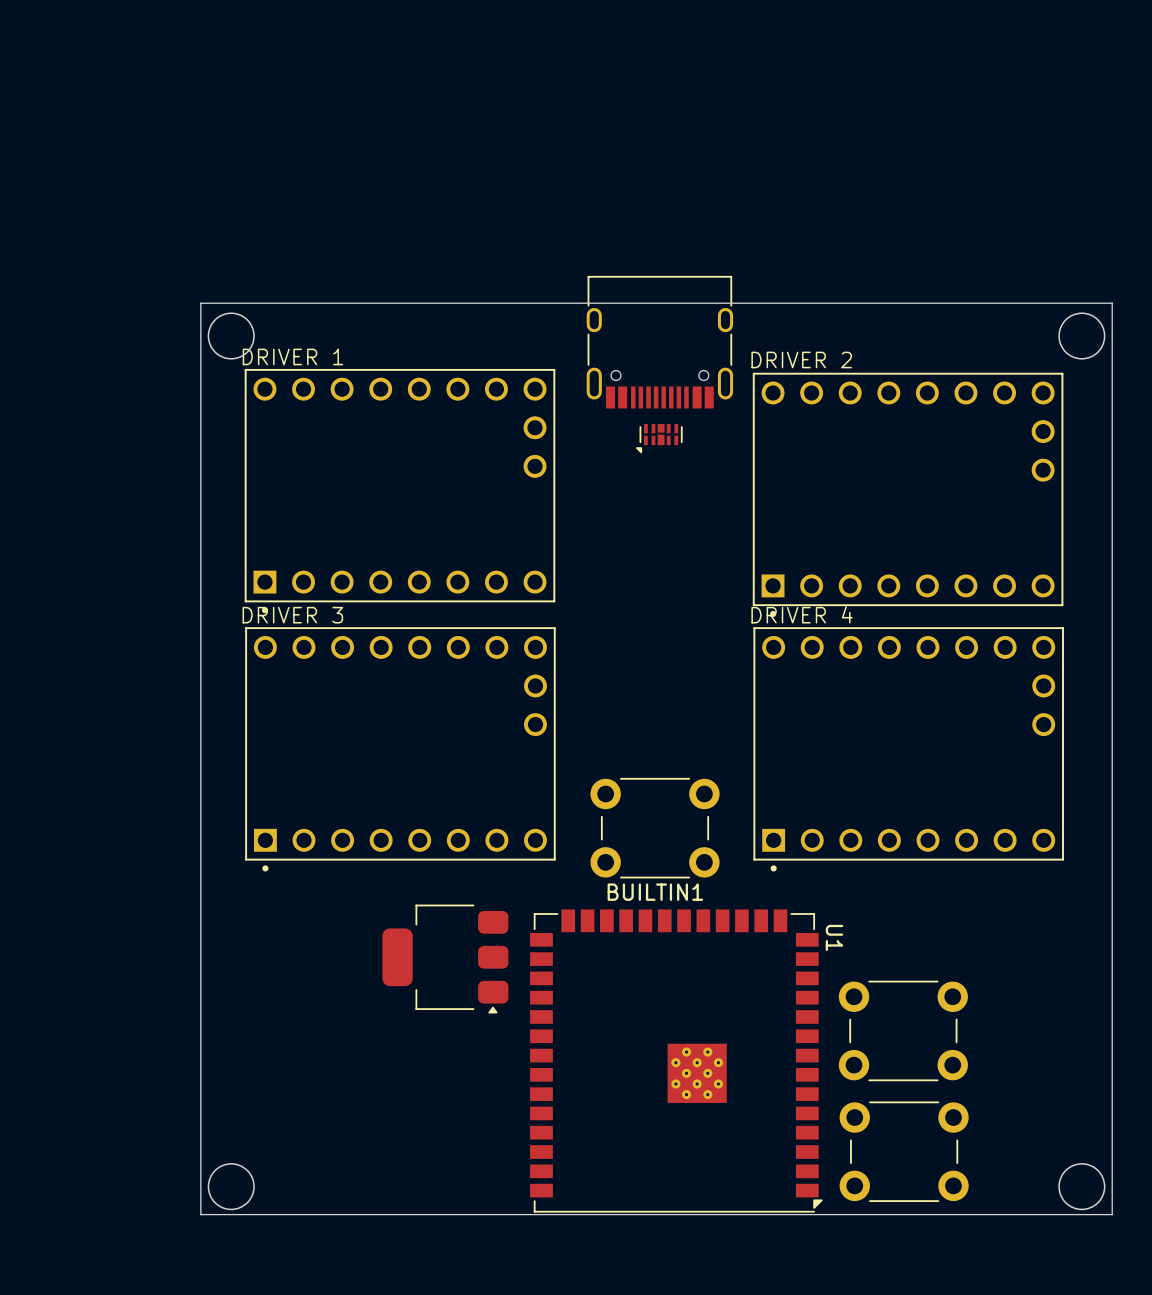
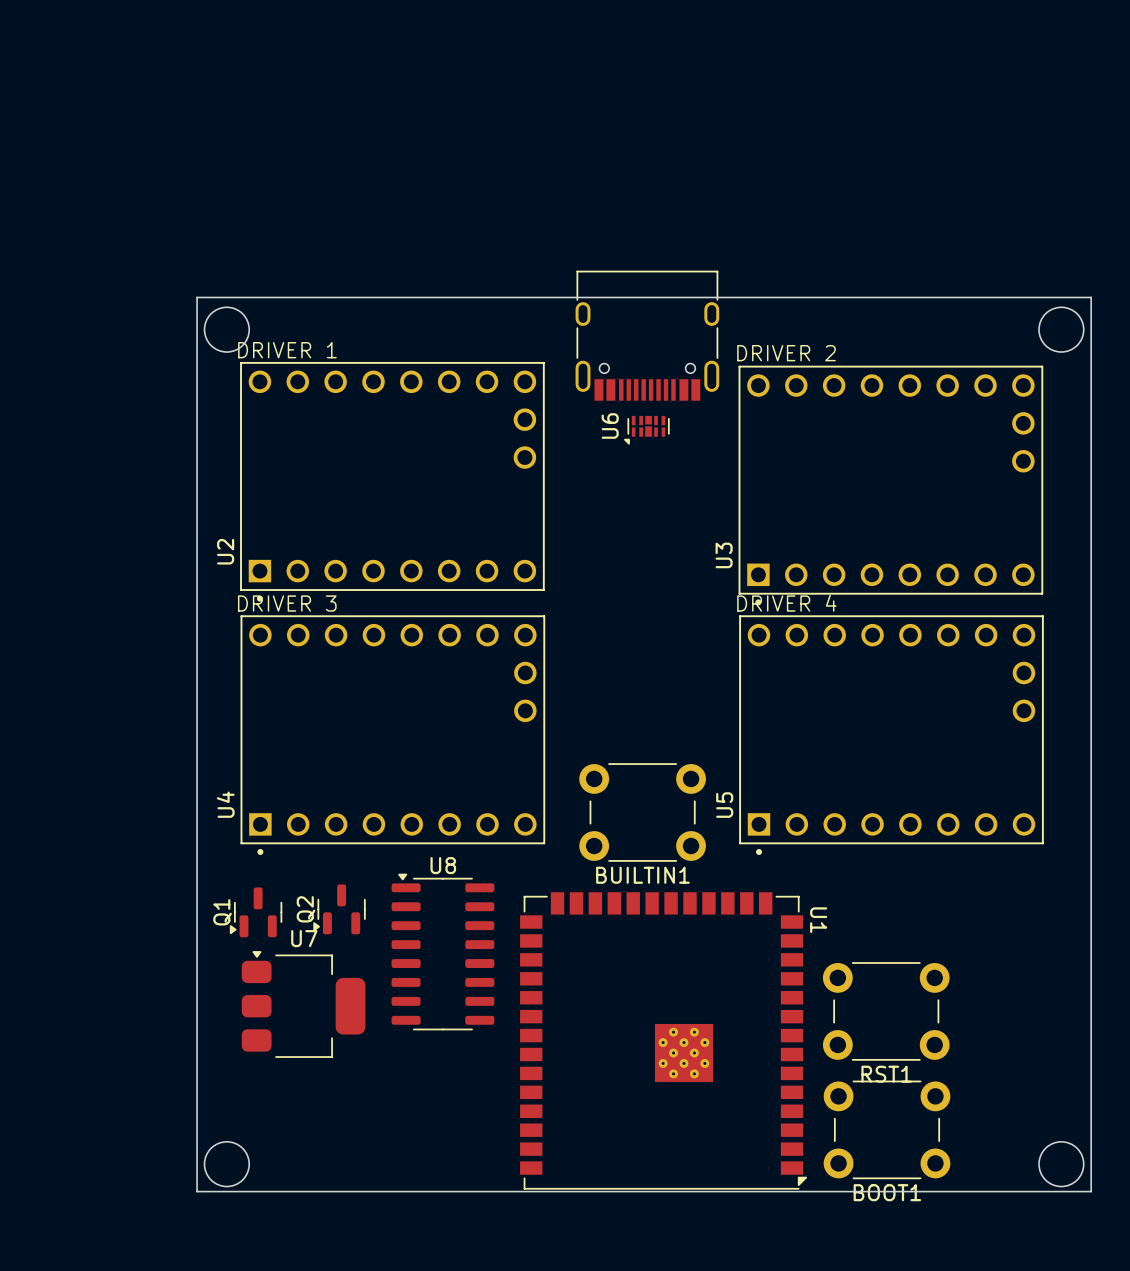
U6 name: none -> U6 (610, 425)
U2 name: none -> U2 (225, 551)
U3 name: none -> U3 (724, 555)
U4 name: none -> U4 (225, 804)
U5 name: none -> U5 (724, 805)
Q2: none -> (339, 909)
Q1: none -> (256, 912)
part: (445, 959) -> none
U8: none -> (442, 952)
U7: none -> (303, 1004)
RST1 name: none -> RST1 (886, 1074)
BOOT1 name: none -> BOOT1 (887, 1192)

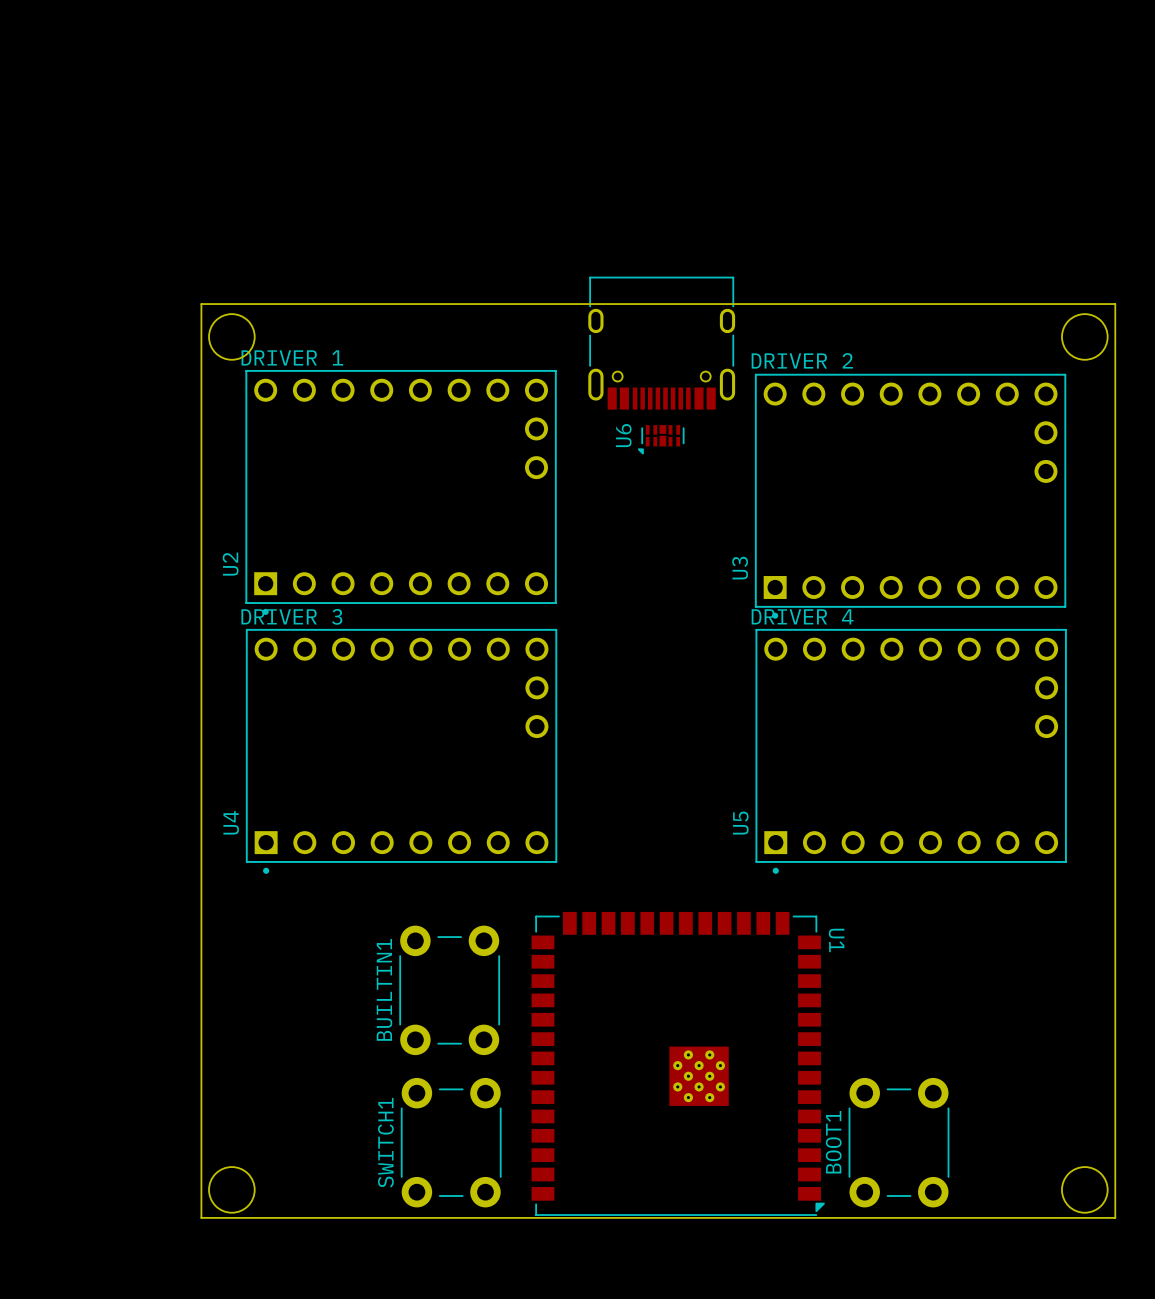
BUILTIN1 rotation: 0° (642, 812) -> 90° clockwise (449, 990)
BUILTIN1 position: (642, 812) -> (449, 990)
Q2: (339, 909) -> none
Q1: (256, 912) -> none
U8: (442, 952) -> none
U7: (303, 1004) -> none
RST1: (886, 1011) -> none
SWITCH1: none -> (451, 1142)
BOOT1 rotation: 0° (887, 1129) -> 90° clockwise (898, 1142)

